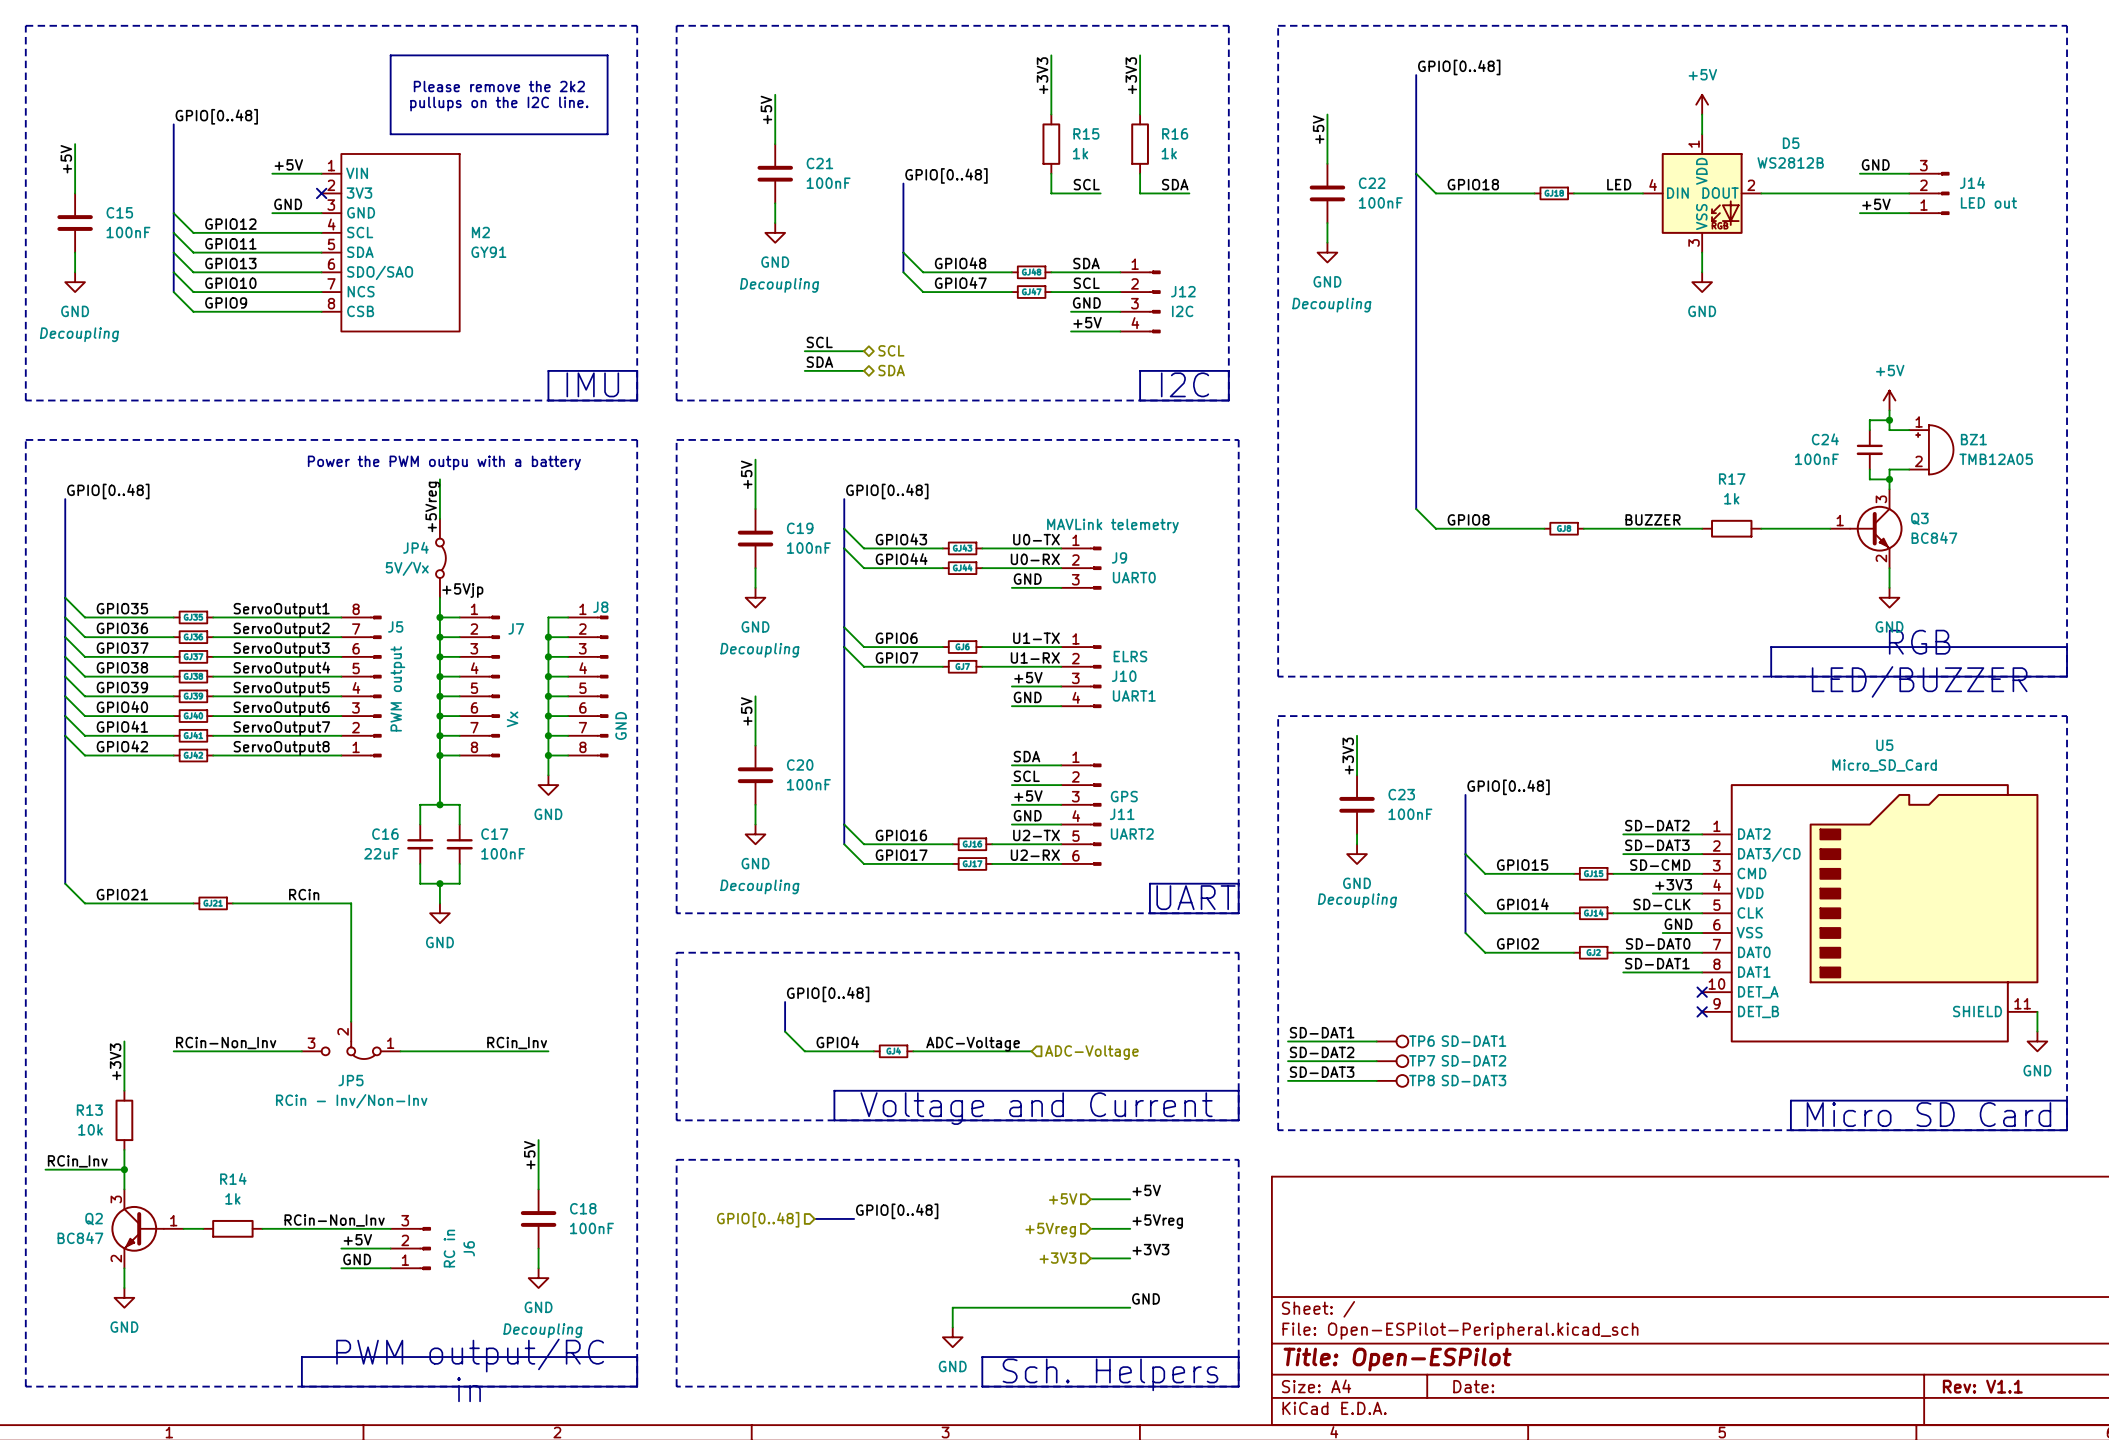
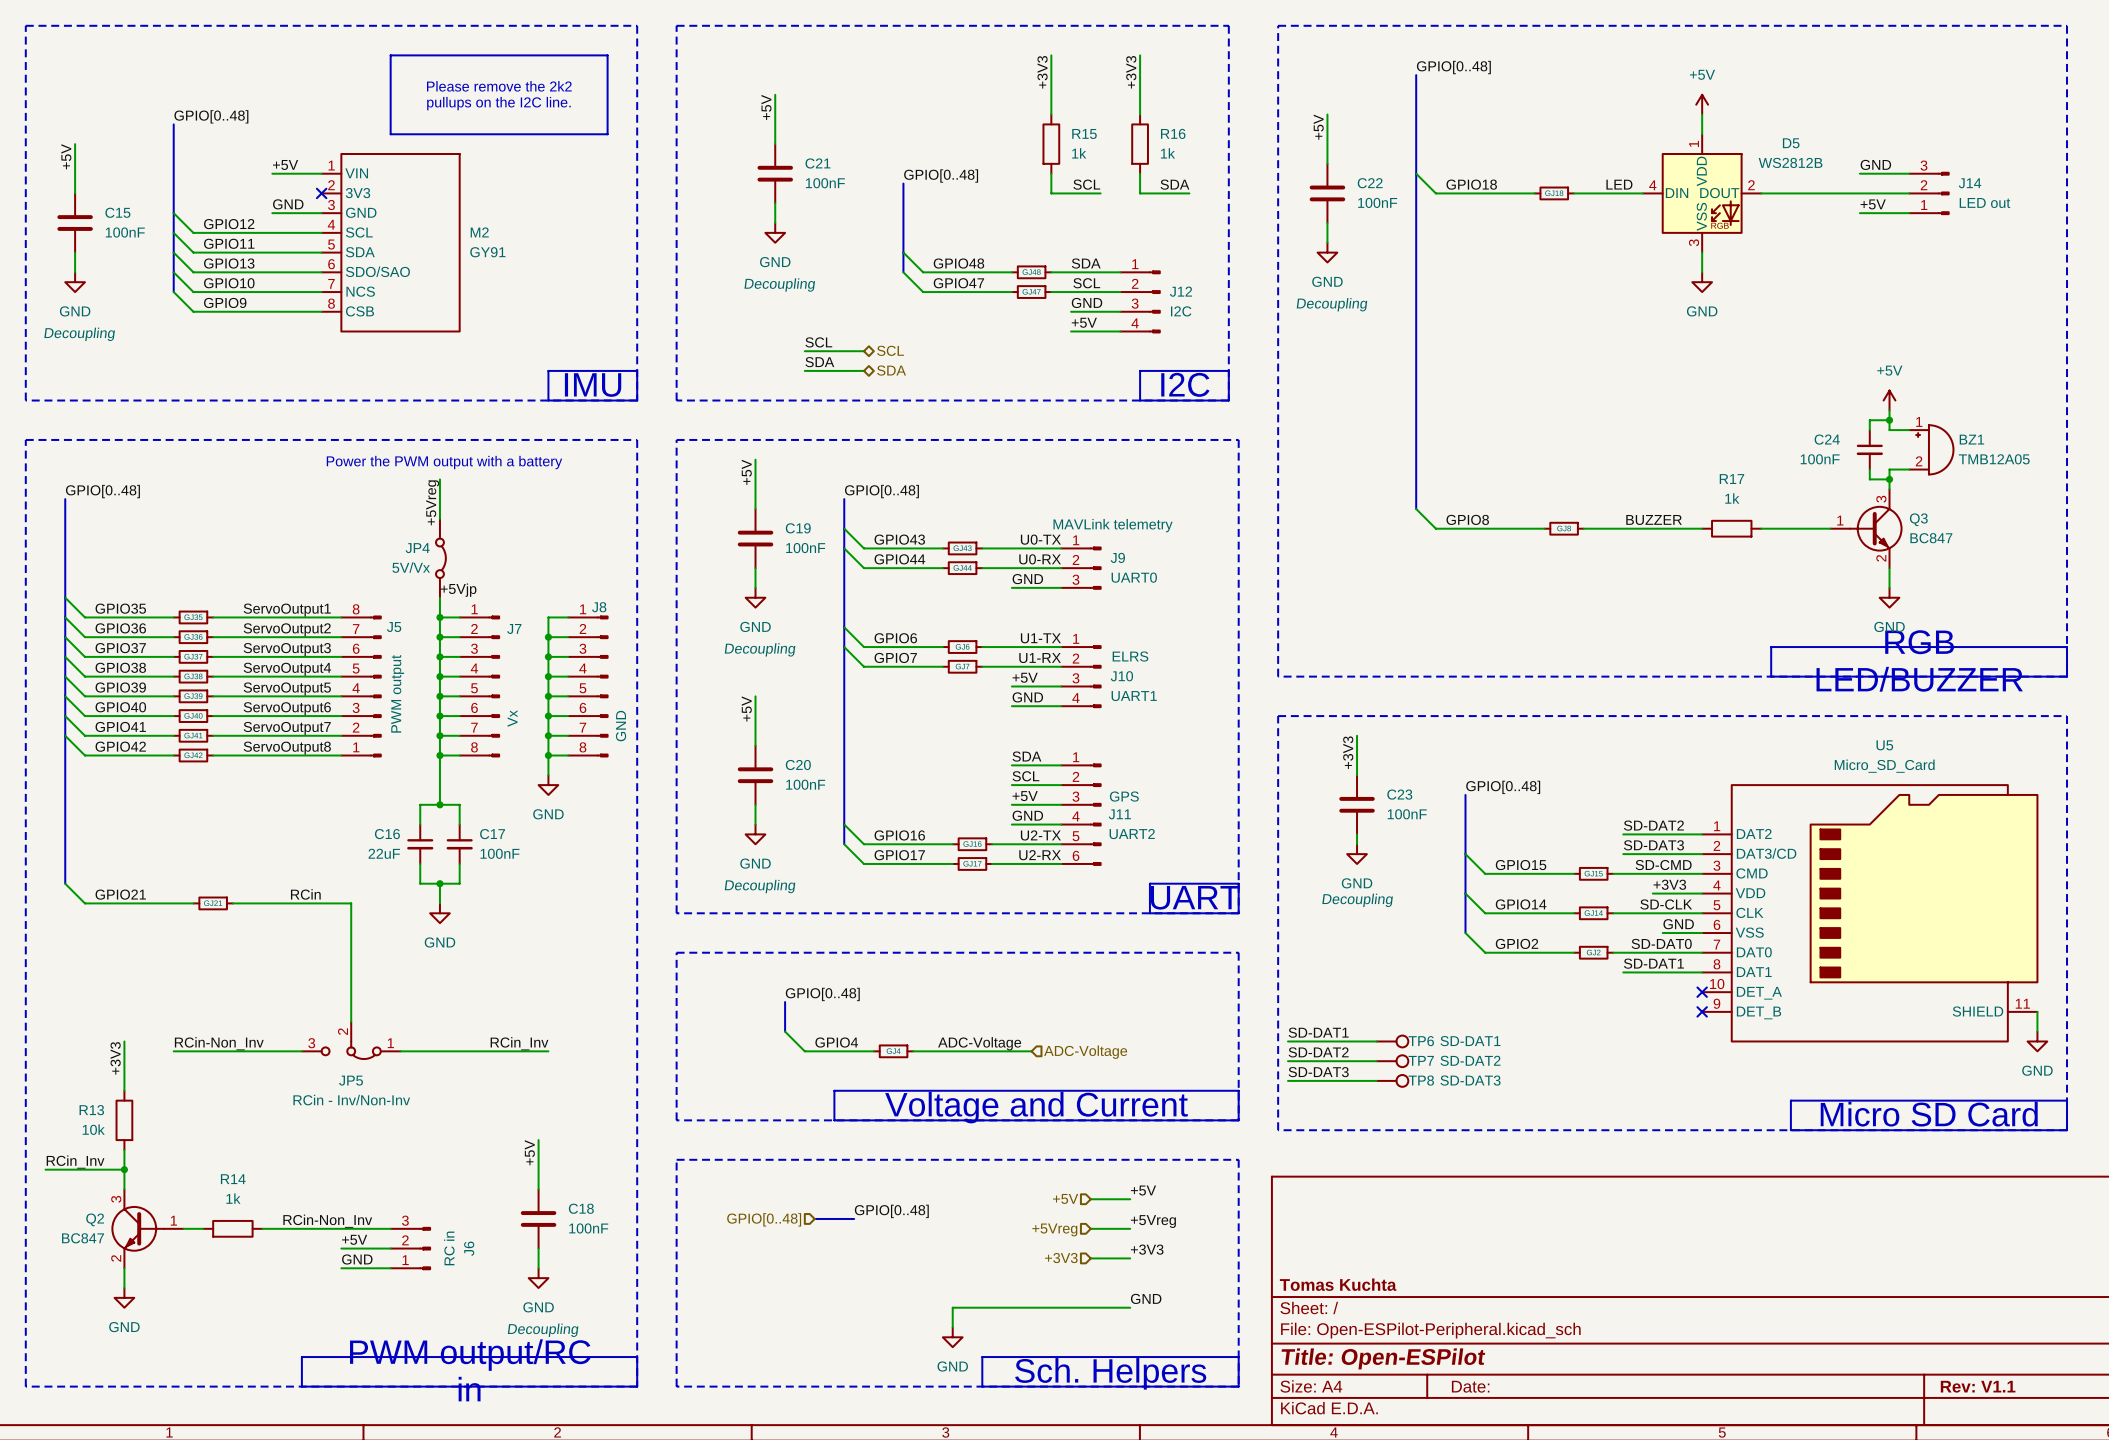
text: Power the PWM outpu with a battery (444, 462) -> Power the PWM output with a battery (444, 462)
title block: none -> Tomas Kuchta (1338, 1284)

